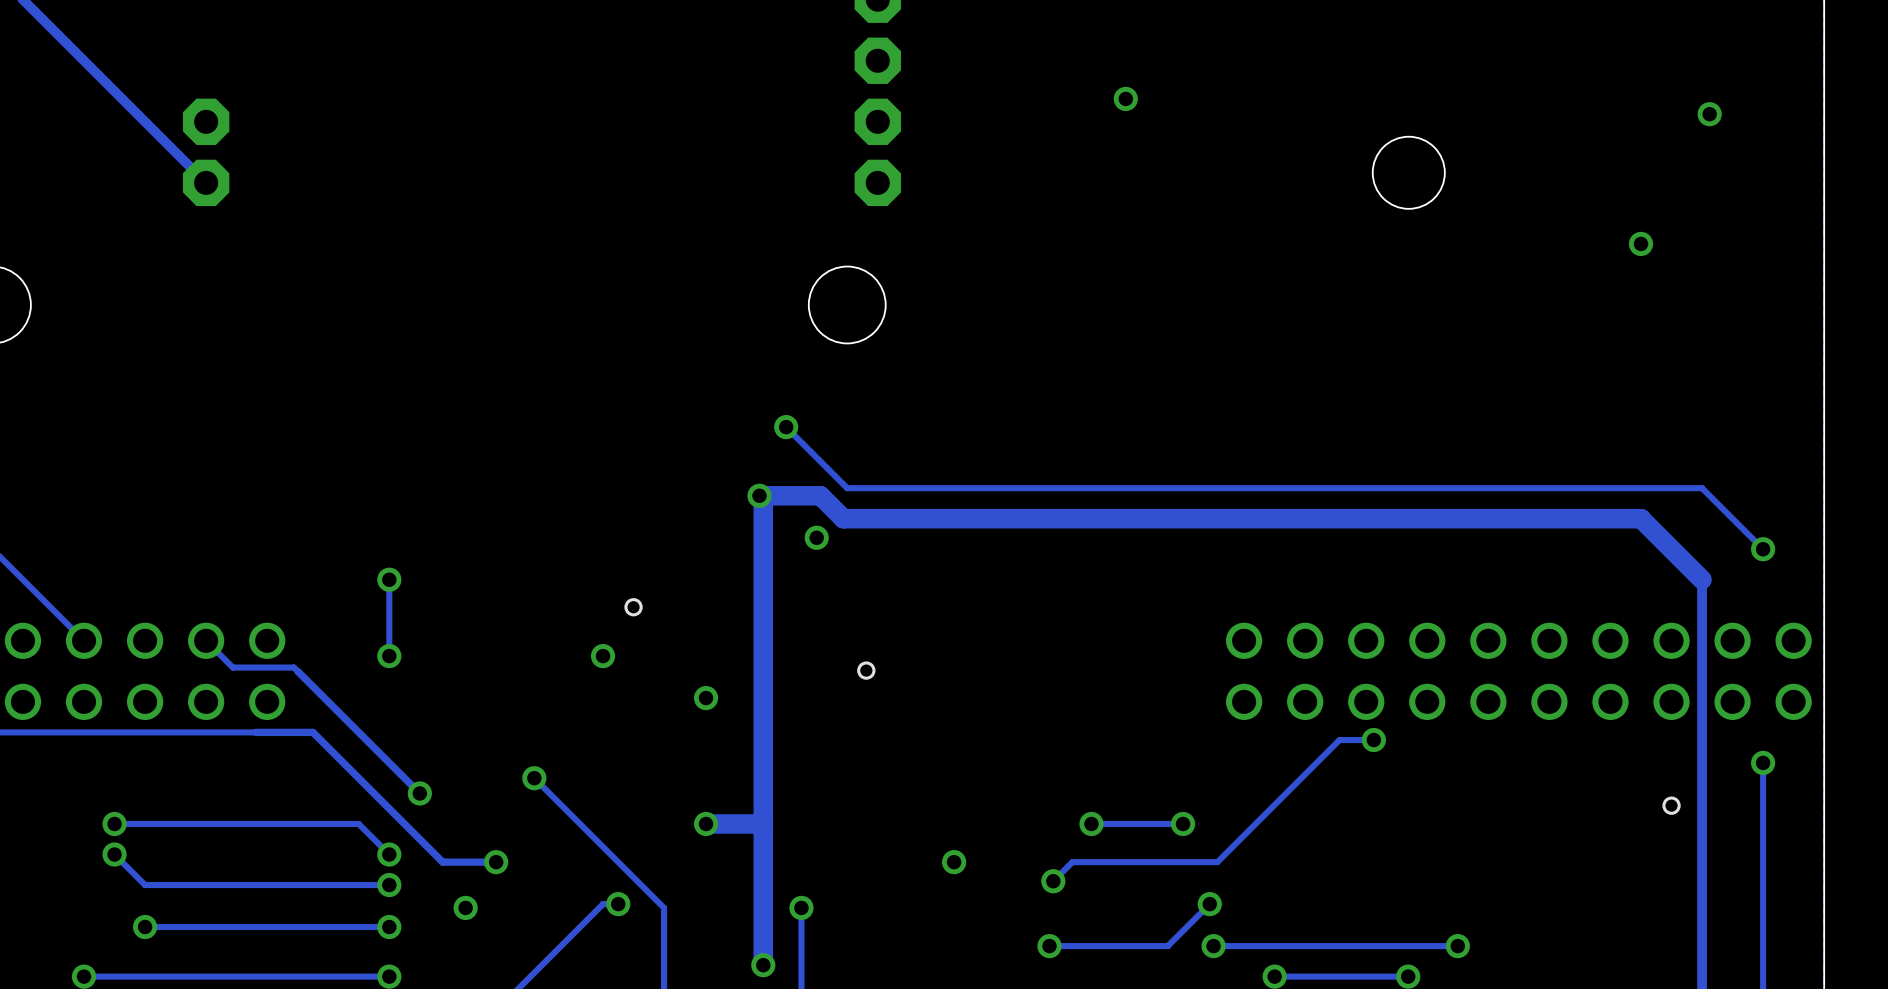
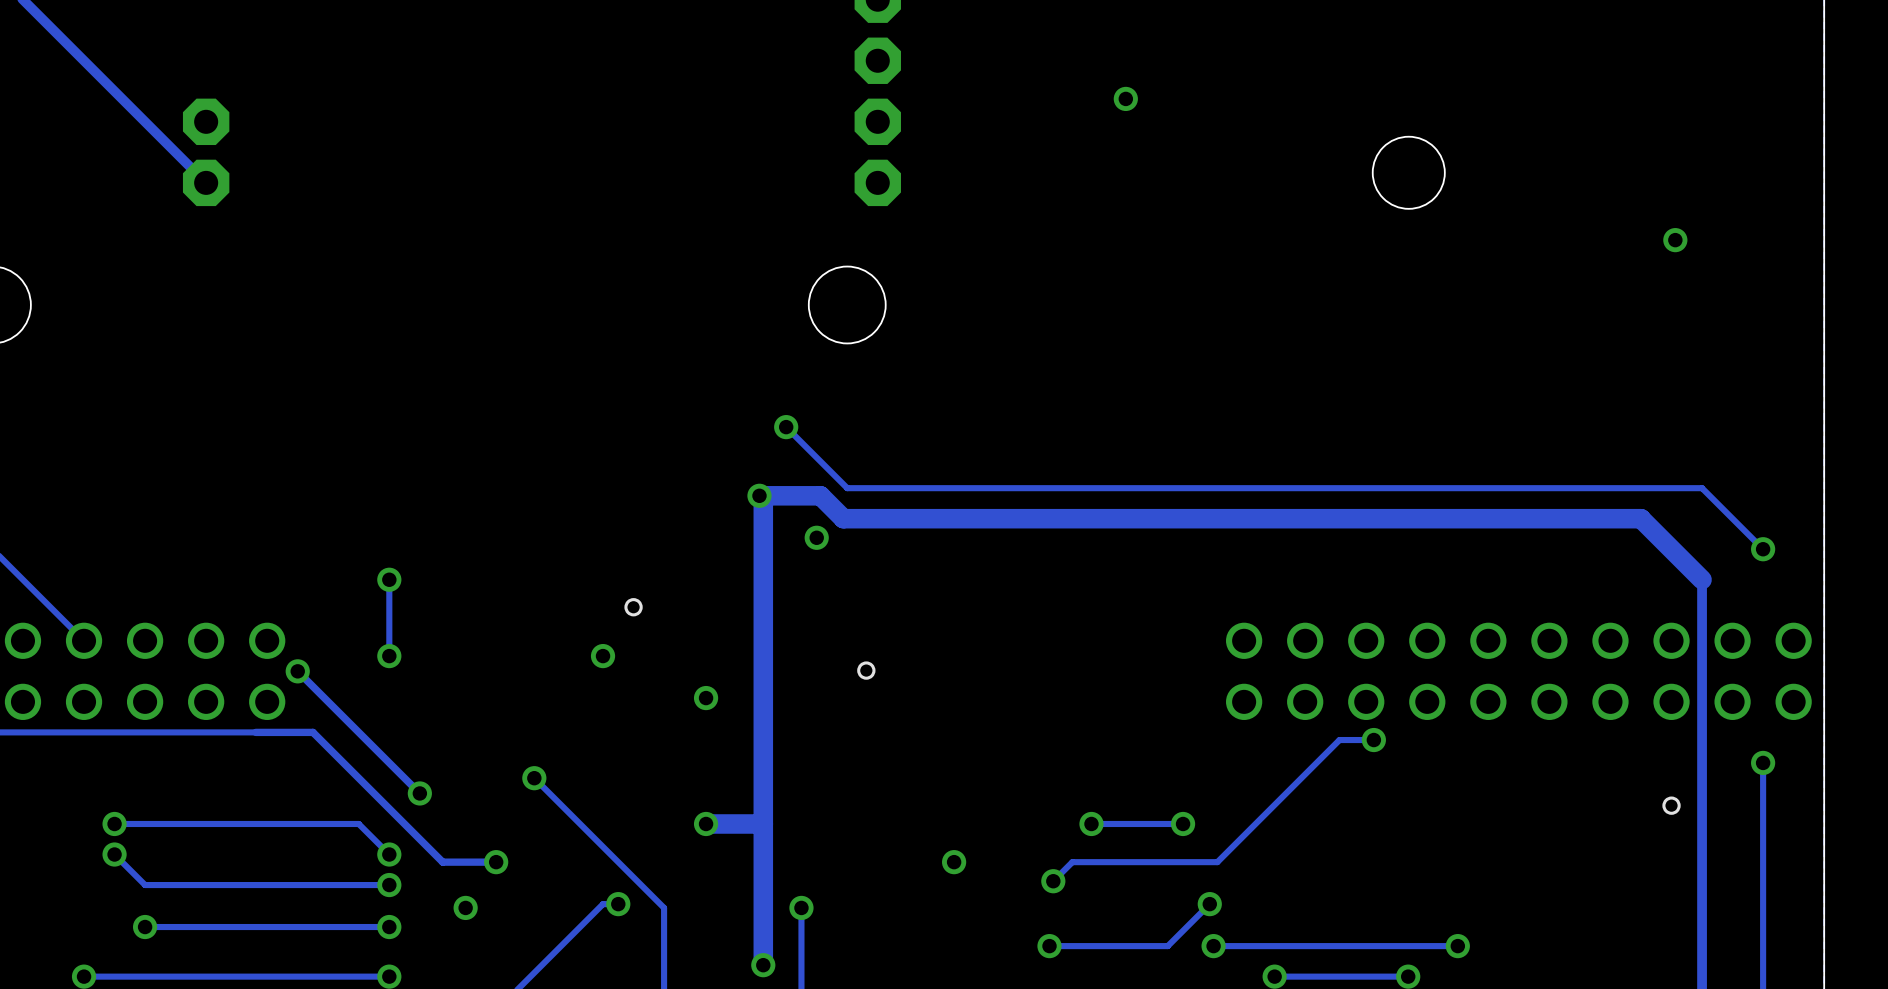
via: (1709, 114) -> none
via position: (1641, 243) -> (1675, 240)
track: (206, 640) (232, 667) (293, 667) (297, 671) -> none
via: none -> (297, 671)

